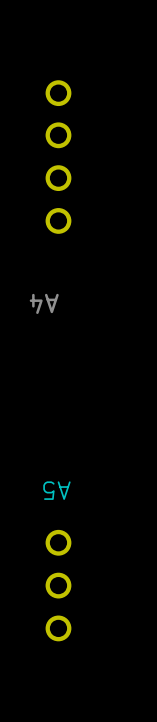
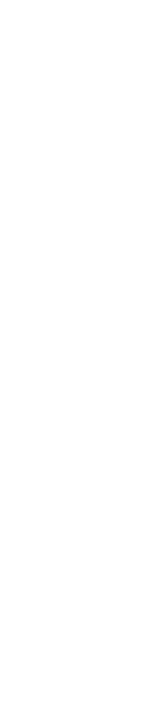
A4: (58, 157) -> none
A5: (58, 585) -> none

